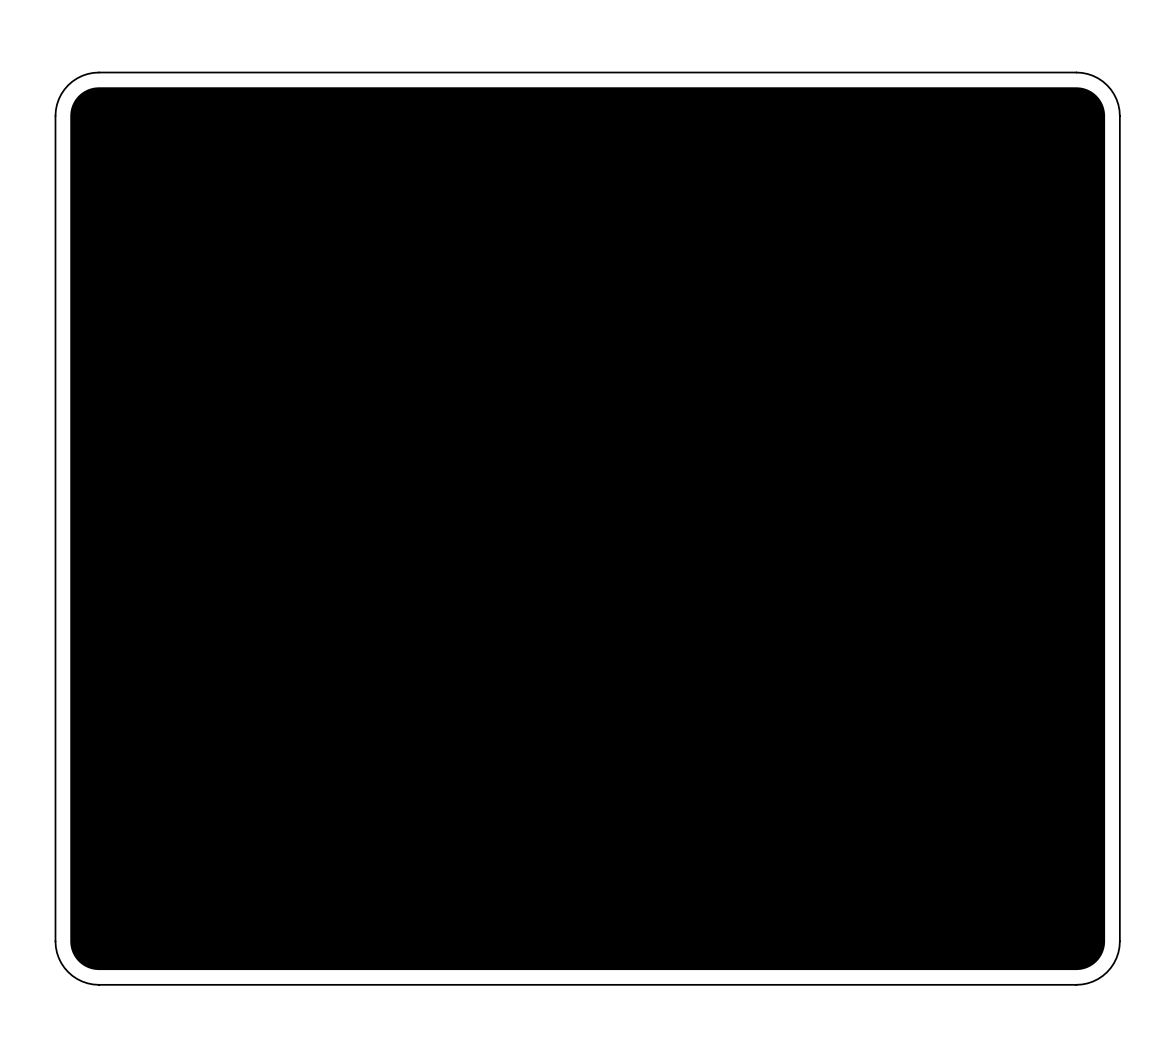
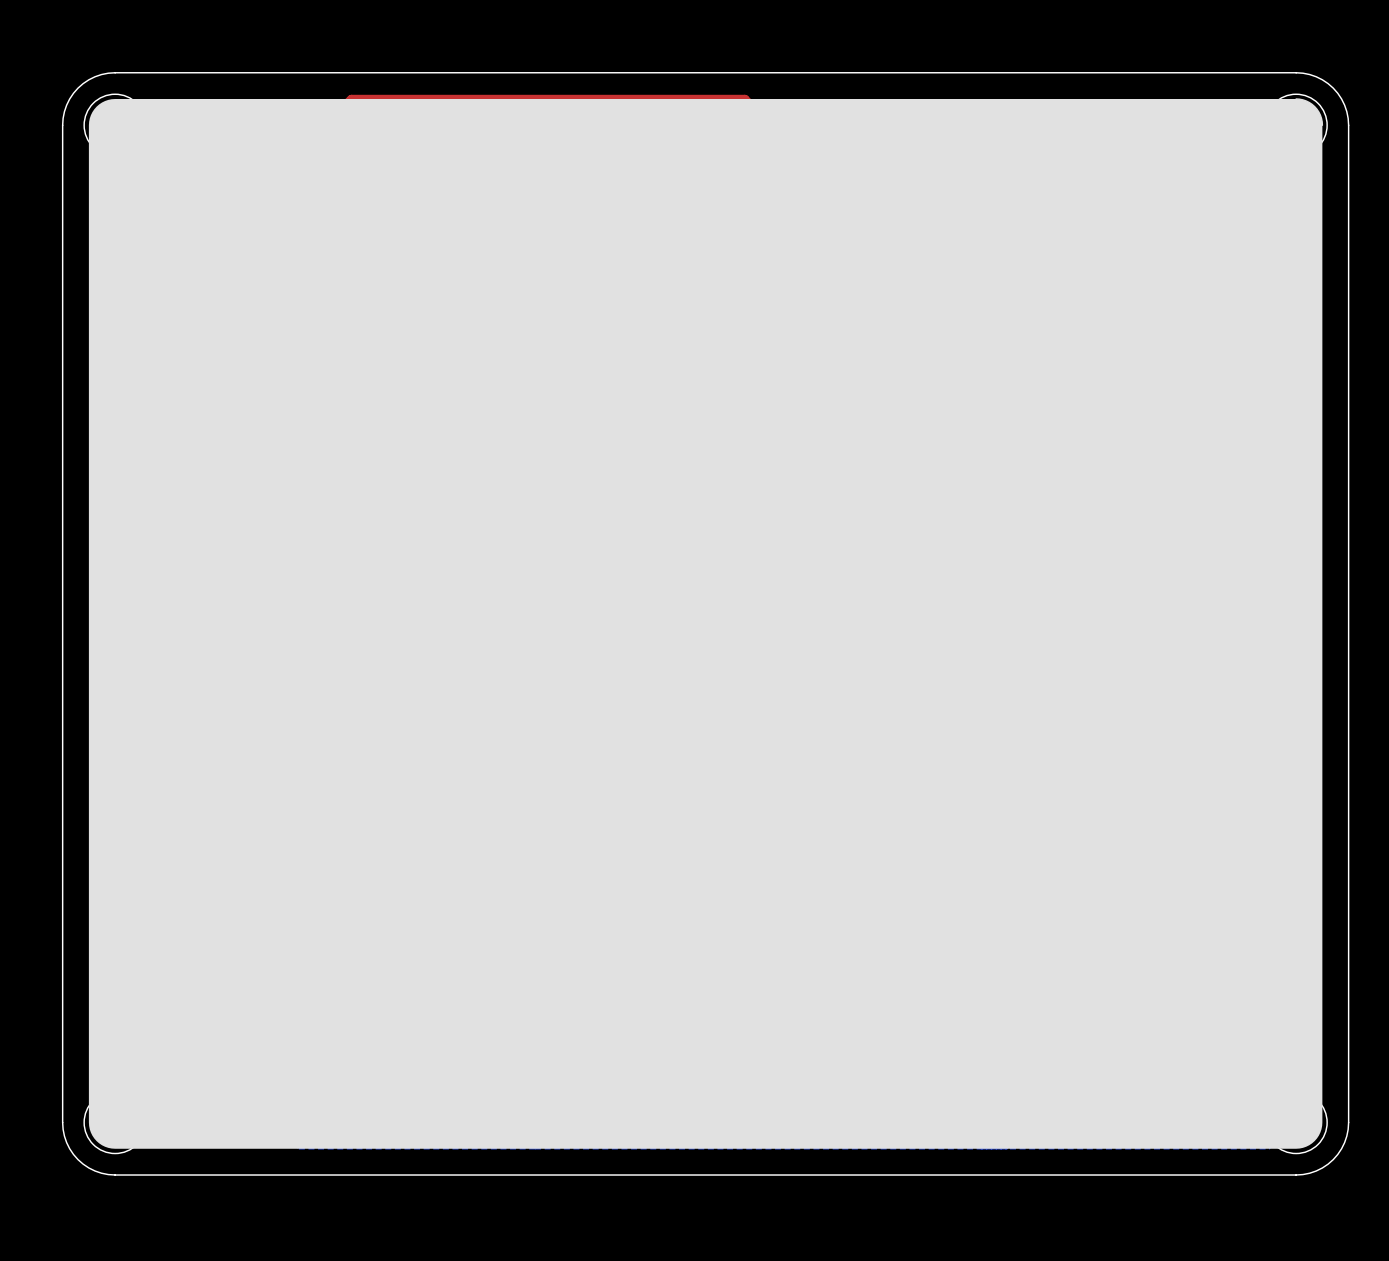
drawing shape: [70, 87, 1106, 971] -> [88, 99, 1323, 1149]

